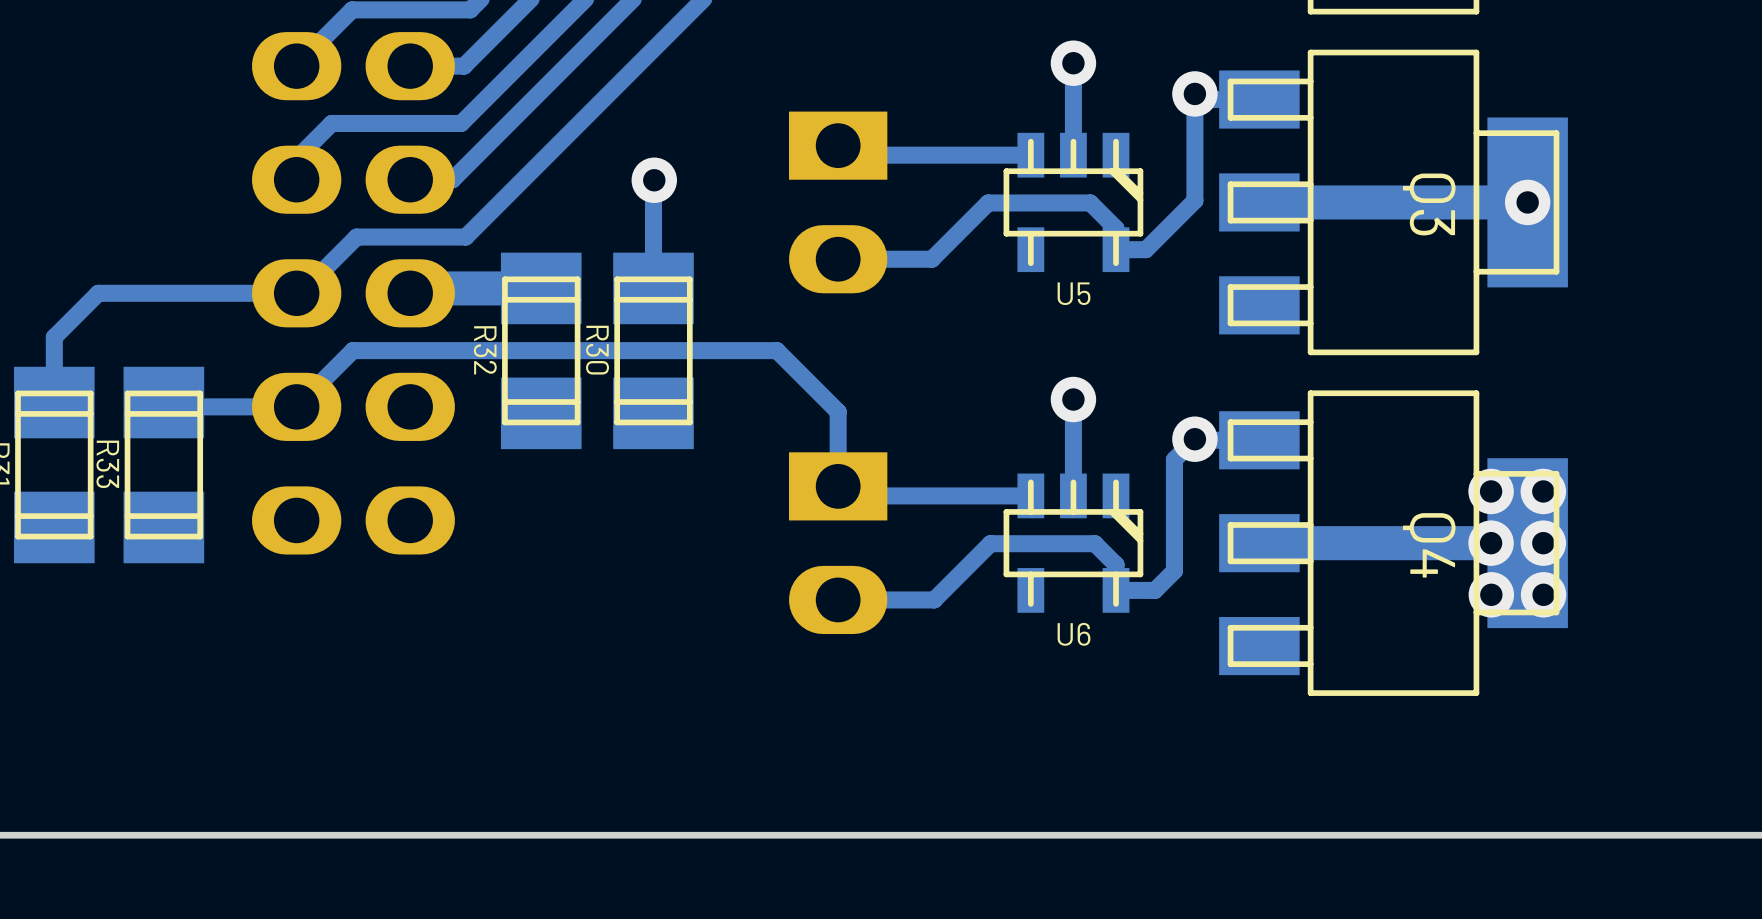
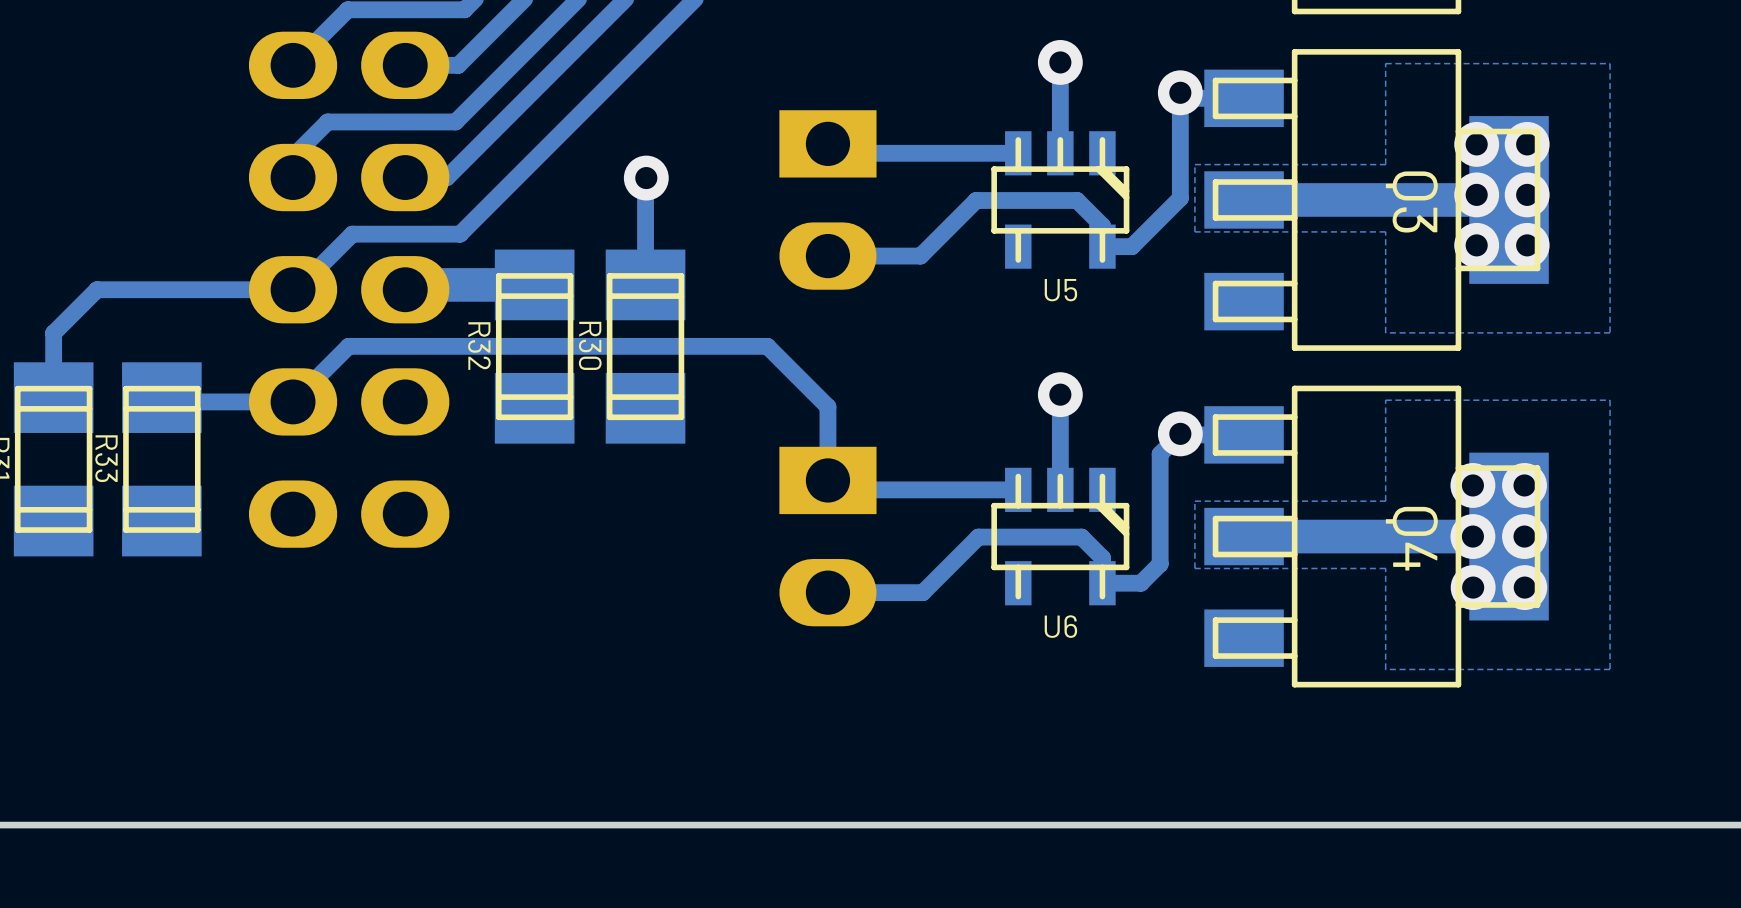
zone outline: none -> (1610, 63) (1610, 332) (1385, 332) (1385, 231) (1194, 231) (1194, 164) (1385, 164) (1385, 63) (1610, 63)
via: none -> (1476, 144)
via: none -> (1527, 144)
via: none -> (1476, 194)
via: none -> (1527, 194)
via: (1527, 202) -> none
via: none -> (1476, 245)
via: none -> (1527, 245)
zone outline: none -> (1610, 400) (1385, 400) (1385, 501) (1194, 501) (1194, 568) (1385, 568) (1385, 669) (1610, 669) (1610, 400)

